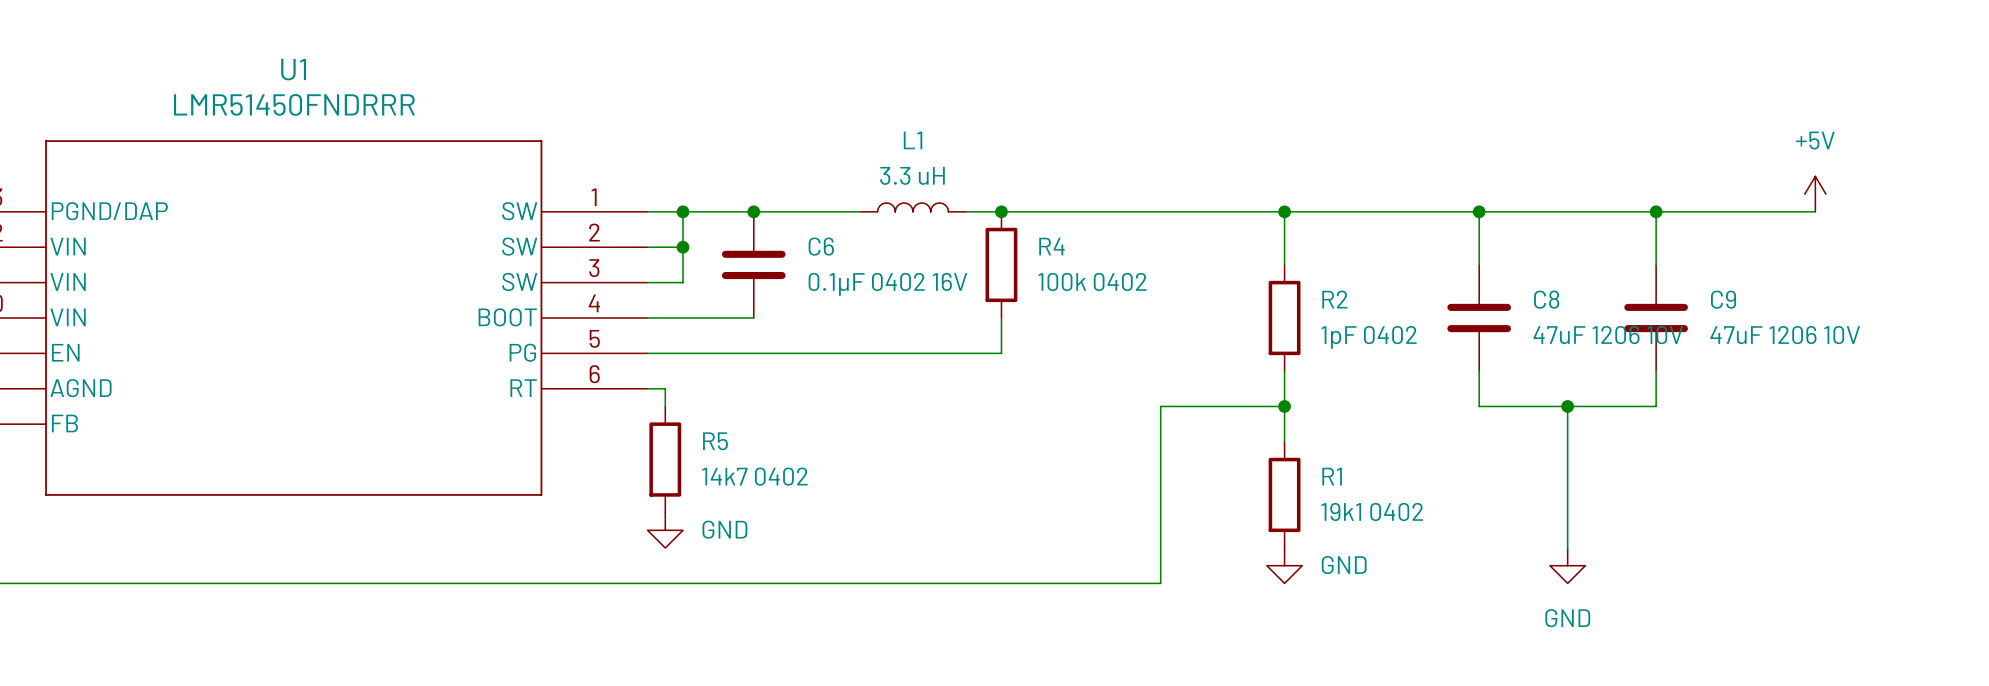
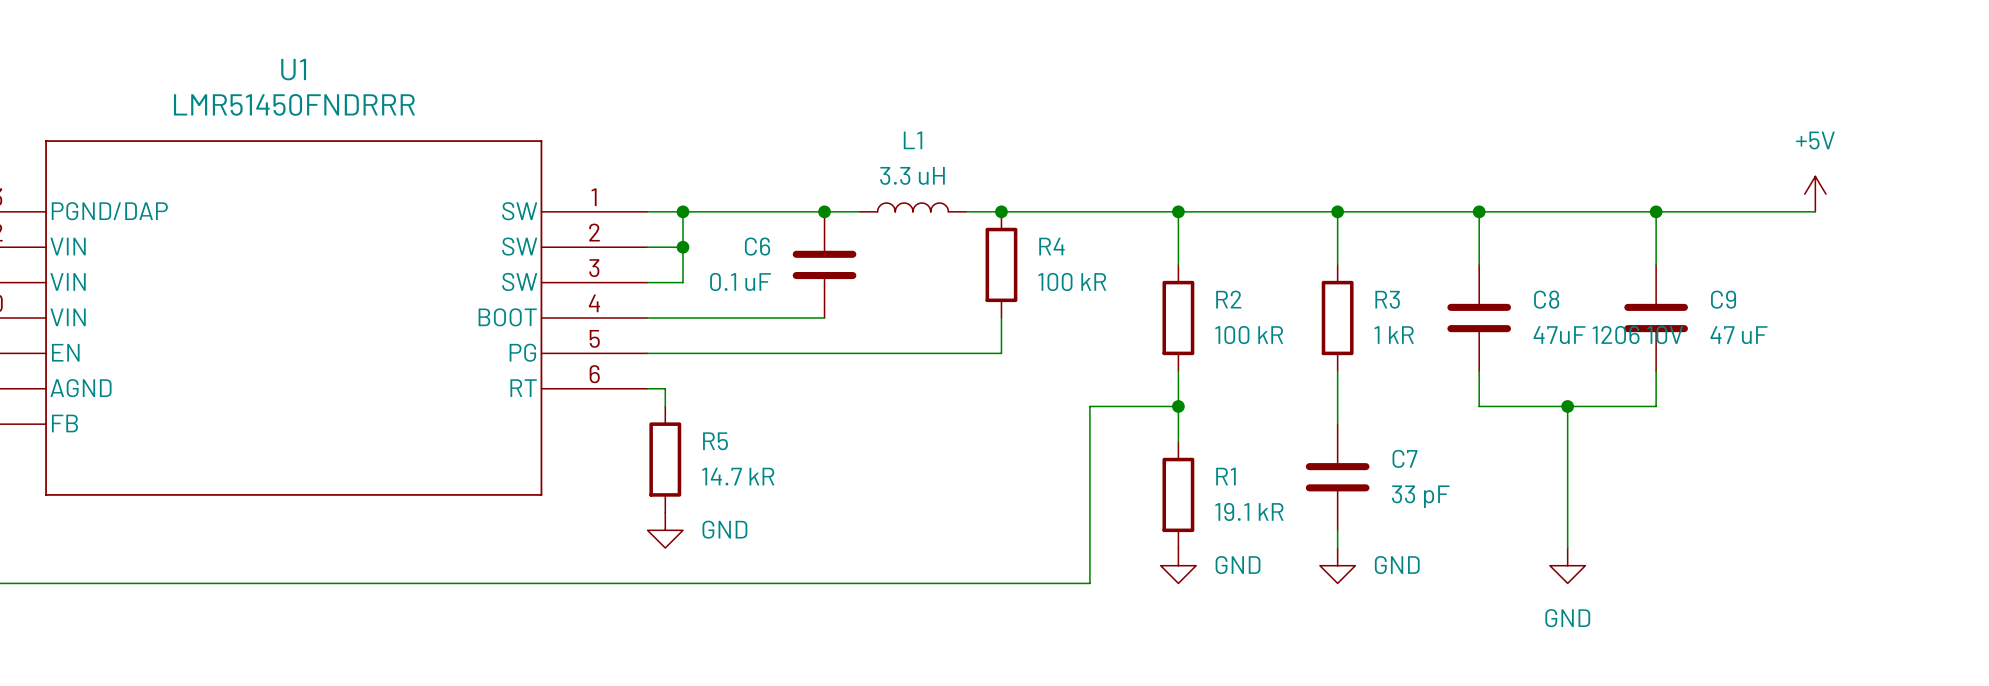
junction position: (753, 211) -> (824, 211)
junction: none -> (1178, 211)
wire: (1284, 211) (1284, 264) -> (1178, 211) (1178, 264)
junction: (1284, 211) -> none
wire: none -> (1337, 211) (1337, 264)
junction: none -> (1337, 211)
C6 name position: C6 (821, 246) -> C6 (757, 246)
C6 position: (753, 264) -> (824, 264)
R4 value: 100k 0402 (1092, 281) -> 100 kR (1072, 281)
C6 value: 0.1μF 0402 16V (887, 284) -> 0.1 uF (740, 281)
wire: none -> (753, 318) (824, 318)
R2 position: (1284, 318) -> (1178, 318)
R3: none -> 1 kR (1337, 318)
C9 value: 47uF 1206 10V (1785, 335) -> 47 uF (1738, 335)
R2 value: 1pF 0402 (1369, 337) -> 100 kR (1249, 335)
wire: (1284, 371) (1284, 441) -> (1178, 371) (1178, 441)
wire: none -> (1337, 371) (1337, 424)
wire: (1160, 406) (1160, 583) (1089, 583) -> (1160, 406) (1089, 406) (1089, 583)
wire: (1178, 406) (1284, 406) -> none
junction: none -> (1178, 406)
junction: (1284, 406) -> none
R5 value: 14k7 0402 (754, 476) -> 14.7 kR (738, 476)
C7: none -> 33 pF (1337, 477)
R1 position: (1284, 494) -> (1178, 494)
R1 value: 19k1 0402 (1372, 511) -> 19.1 kR (1249, 511)
wire: none -> (1337, 530) (1337, 548)
power symbol: none -> GND (1178, 565)
power symbol: GND (1284, 565) -> none
power symbol: none -> GND (1337, 565)

